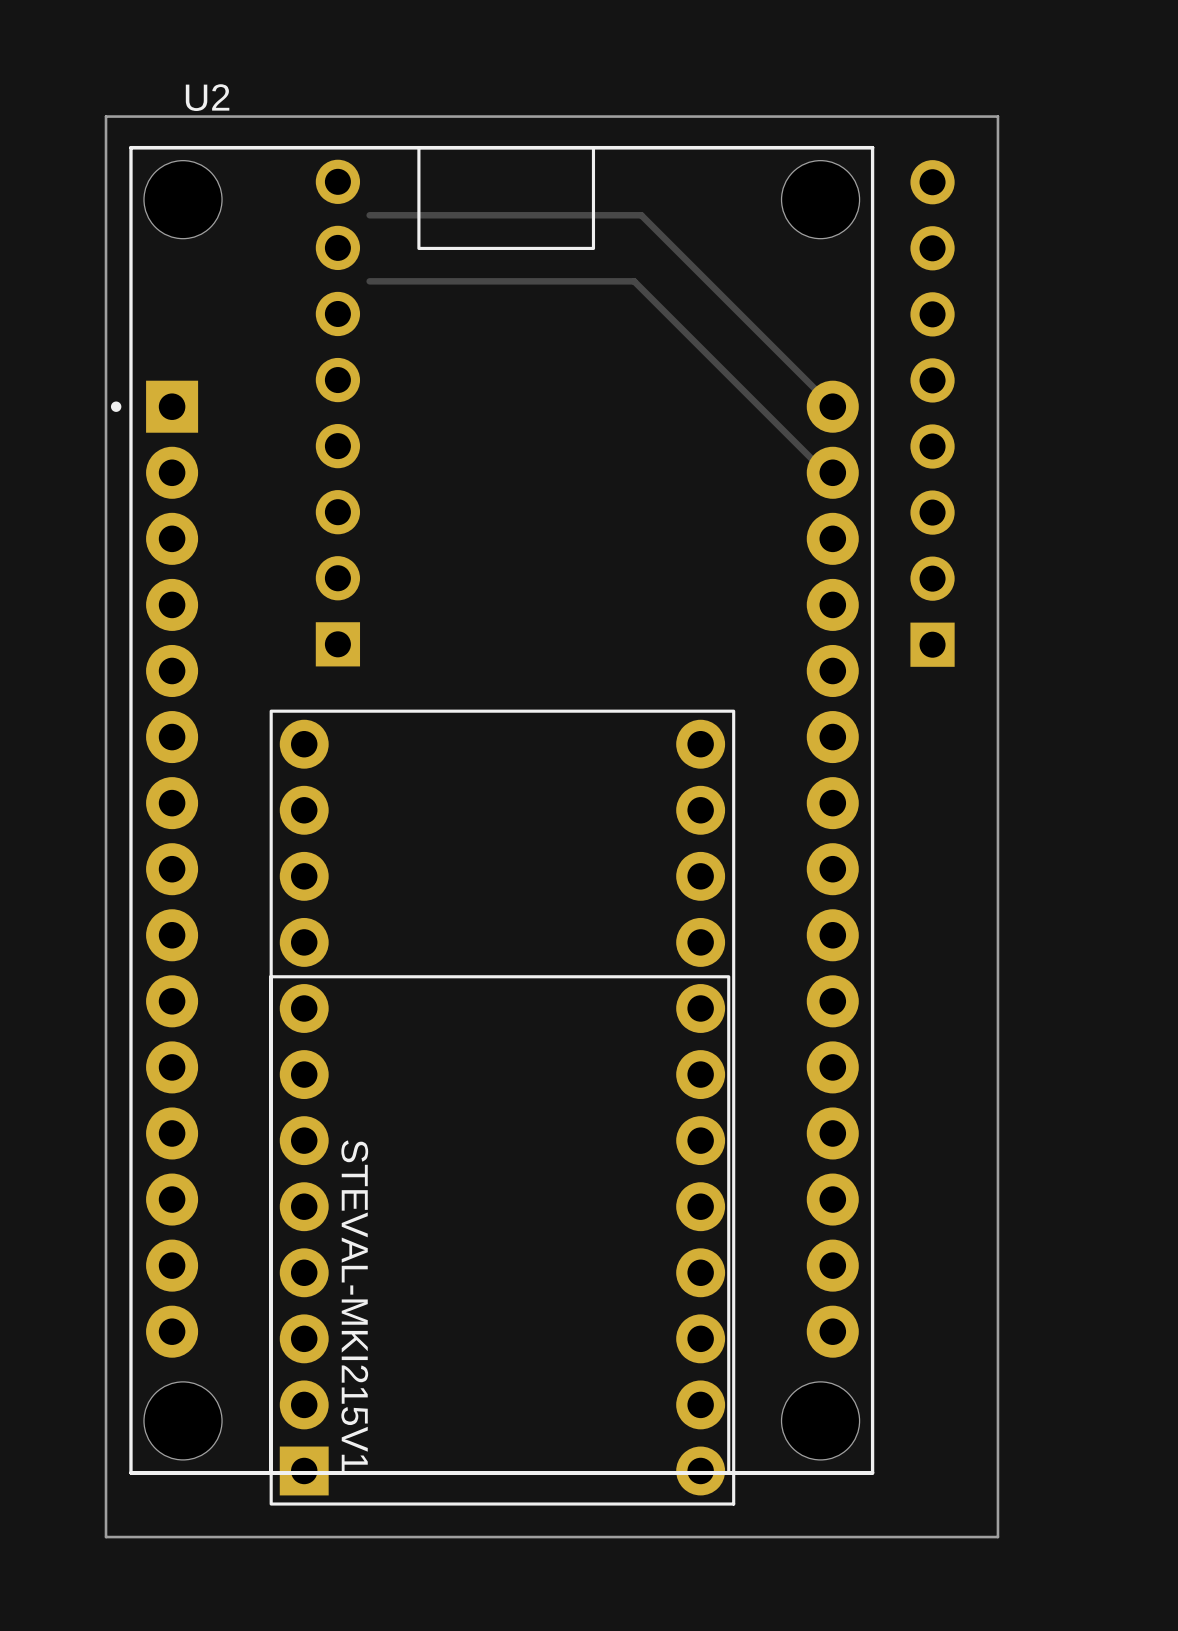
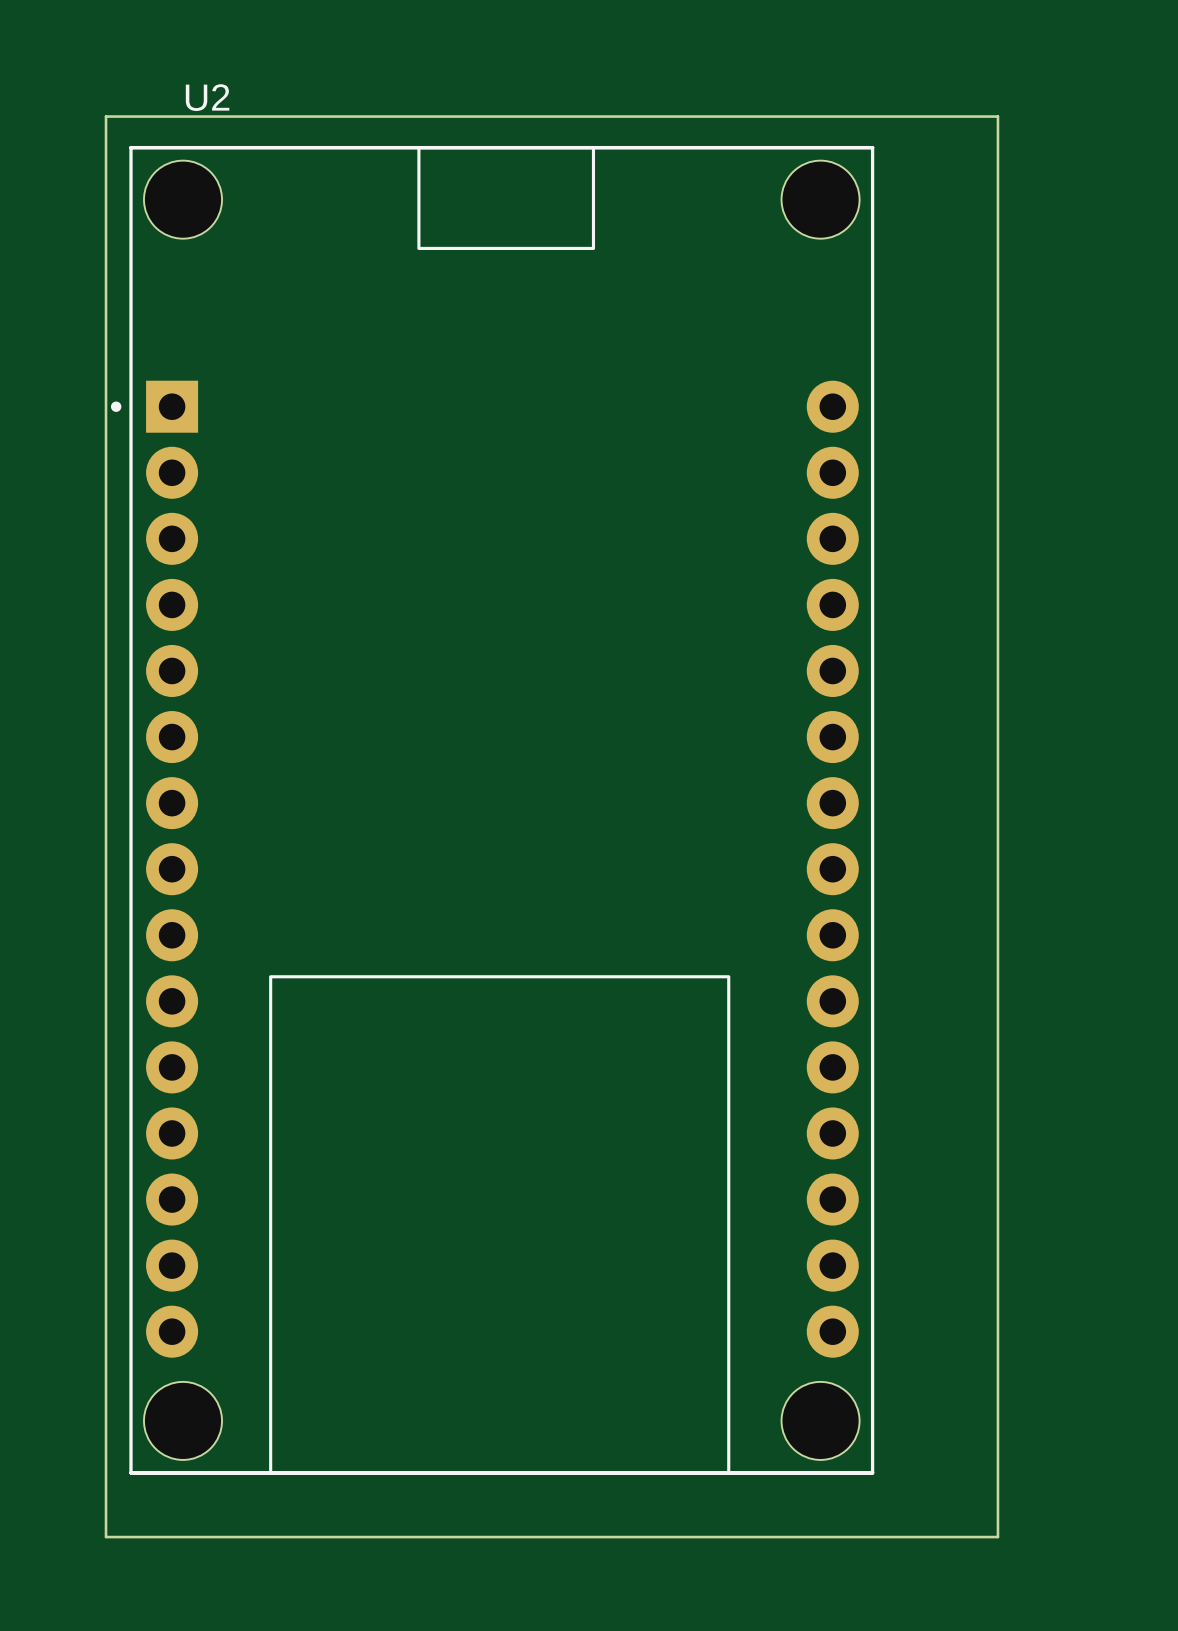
track: (369, 215) (641, 215) (832, 406) -> none
track: (369, 281) (634, 281) (825, 472) (832, 472) -> none
part: (337, 413) -> none
part: (932, 413) -> none
part: (502, 1107) -> none

